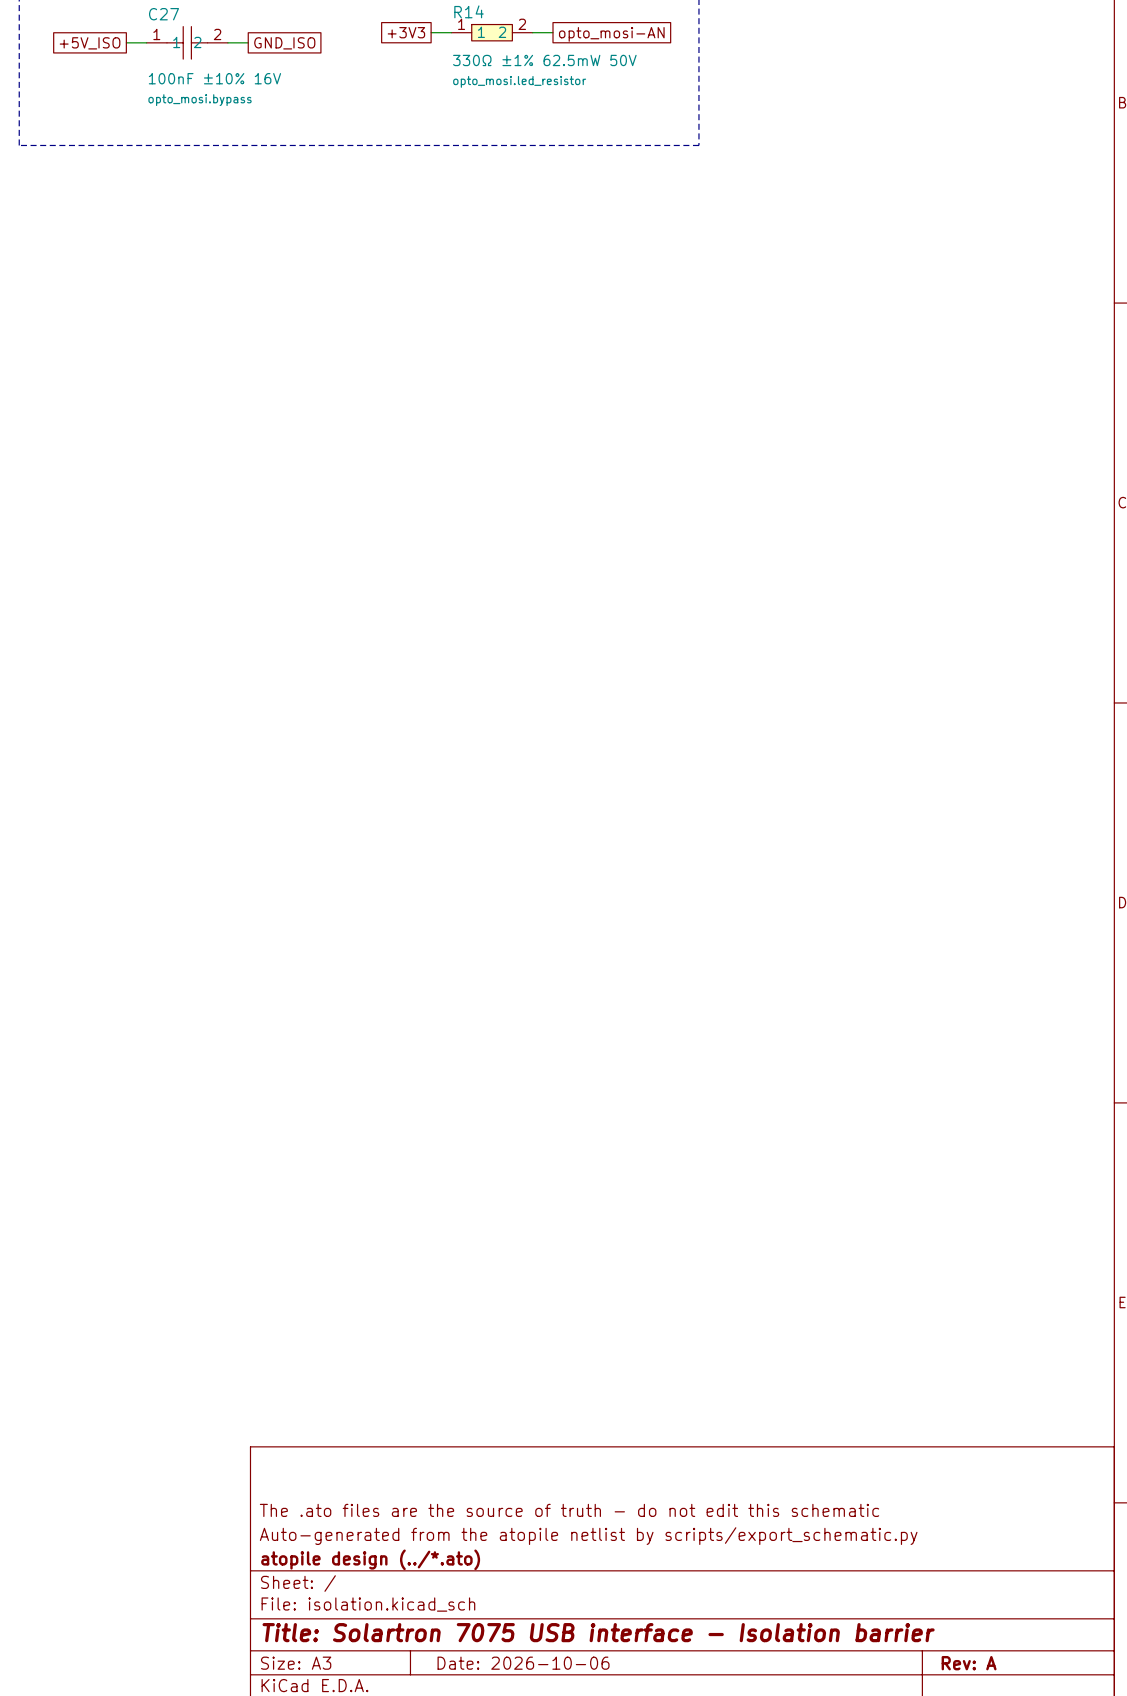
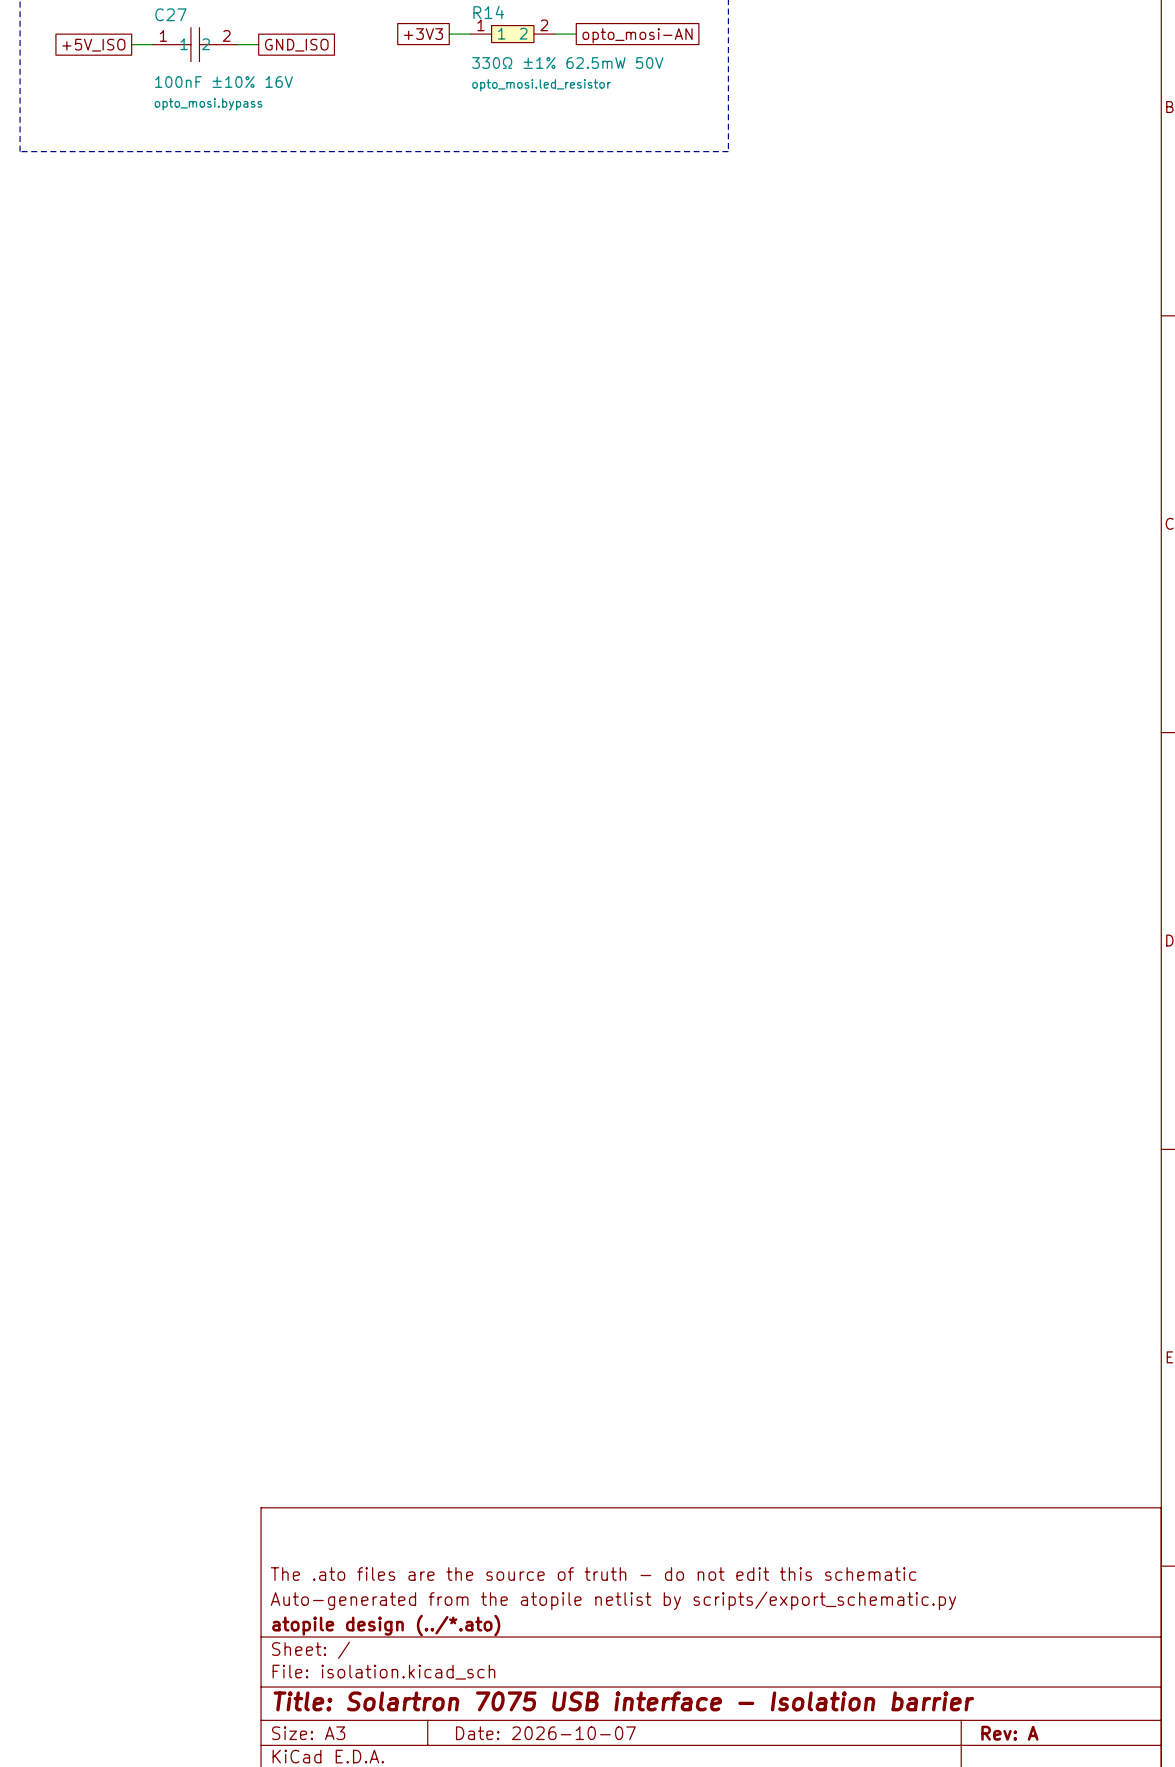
title block: Date: 2026-10-06 (523, 1663) -> Date: 2026-10-07 (545, 1733)

